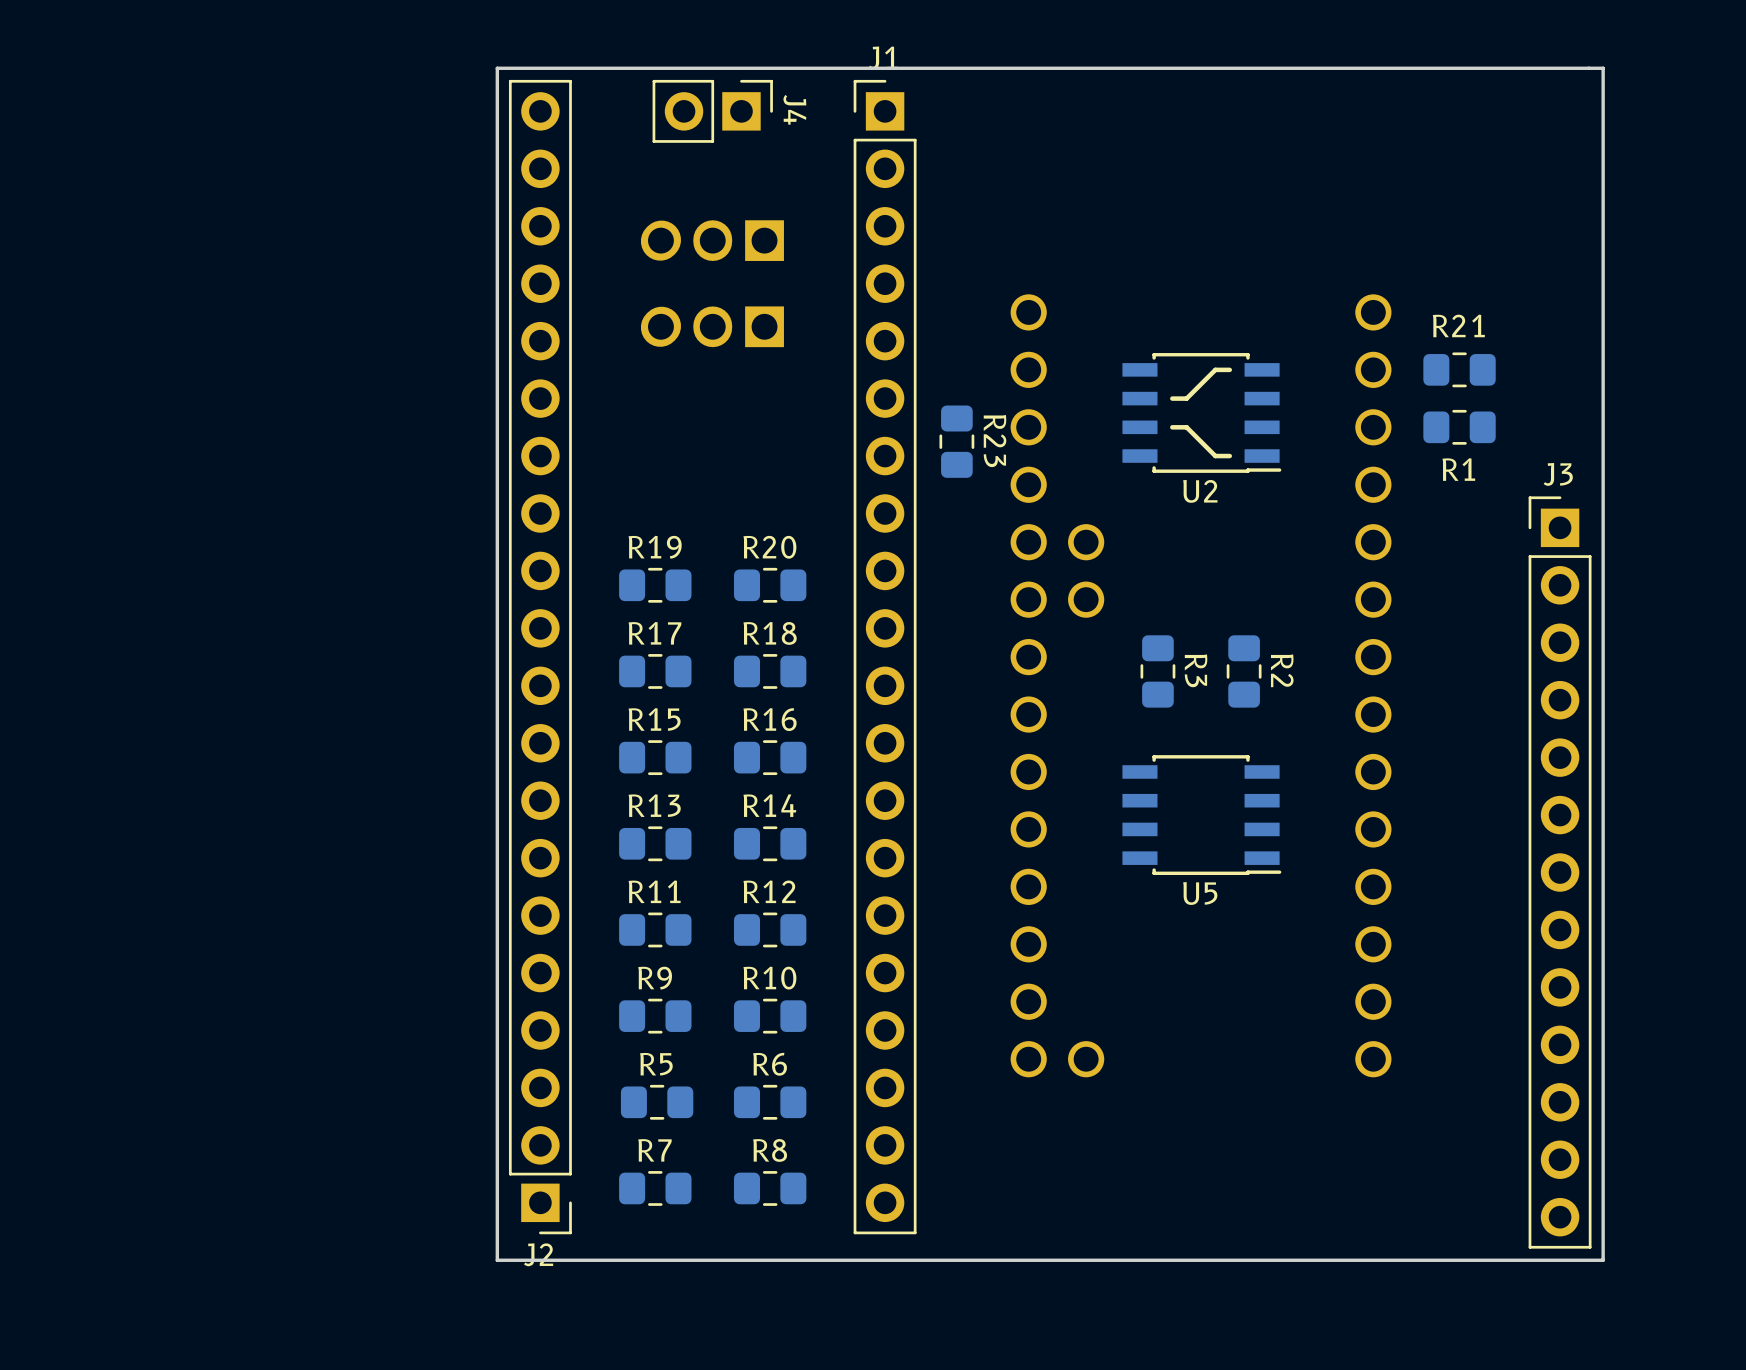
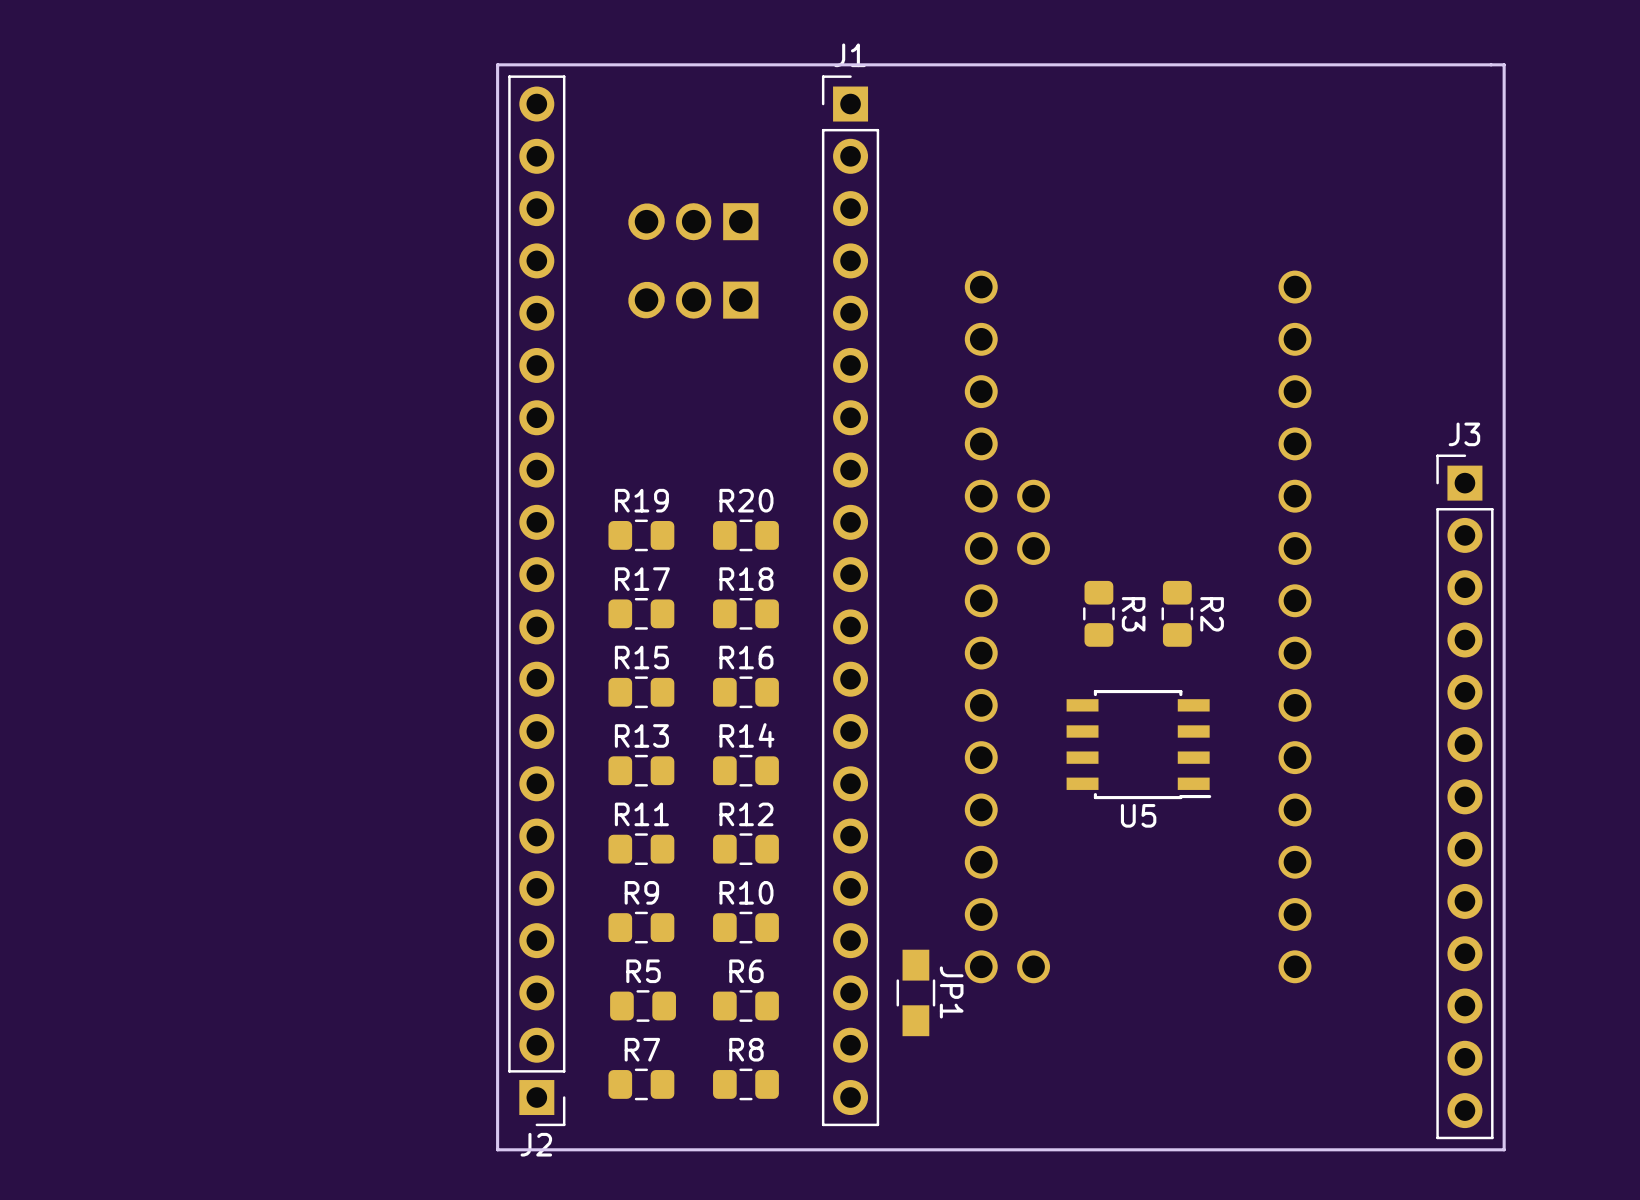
J4: (712, 111) -> none
line: (1229, 369) (1215, 369) (1186, 398) (1172, 398) -> none
R21: (1459, 369) -> none
U2: (1201, 412) -> none
line: (1172, 427) (1186, 427) (1215, 456) (1229, 456) -> none
R1: (1459, 427) -> none
R23: (956, 441) -> none
JP1: none -> (915, 992)

